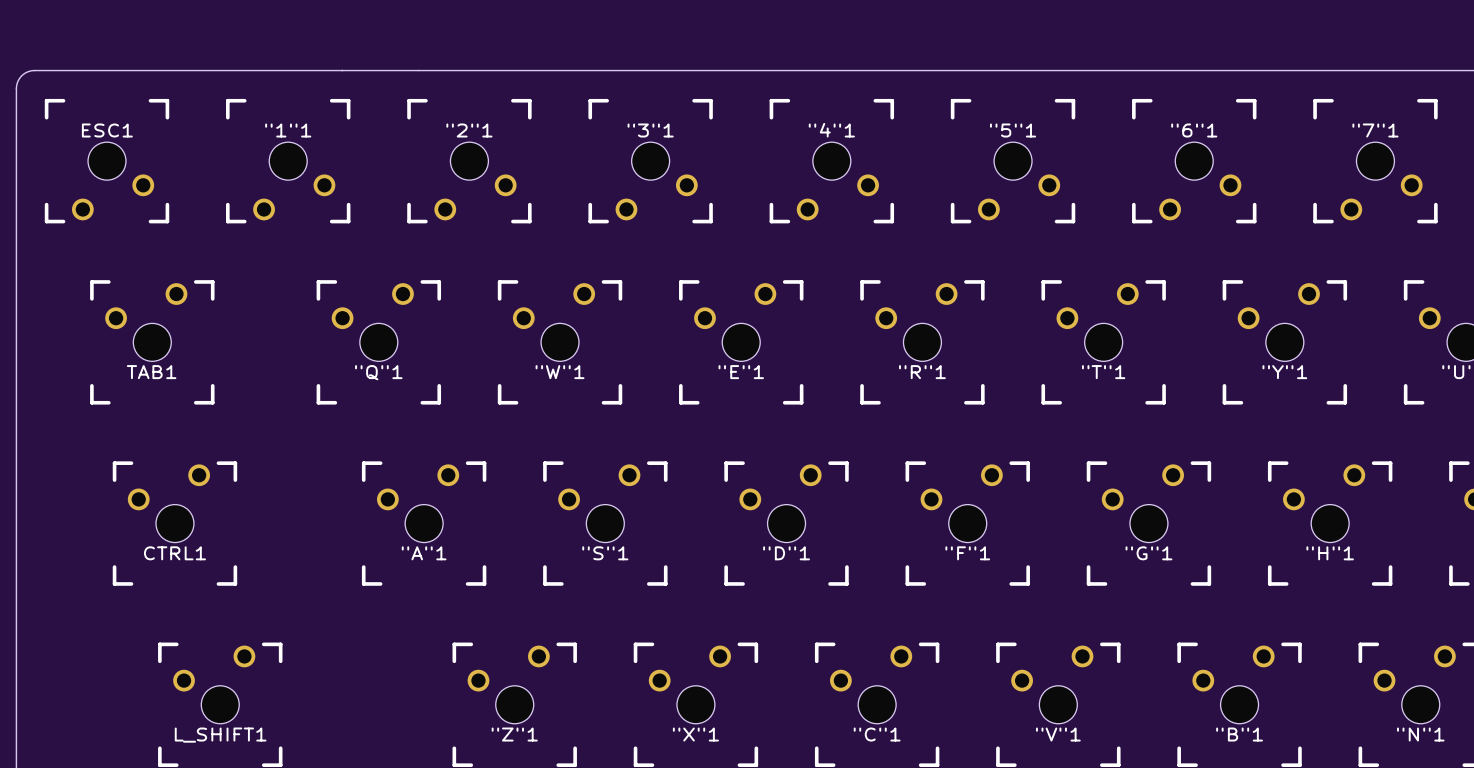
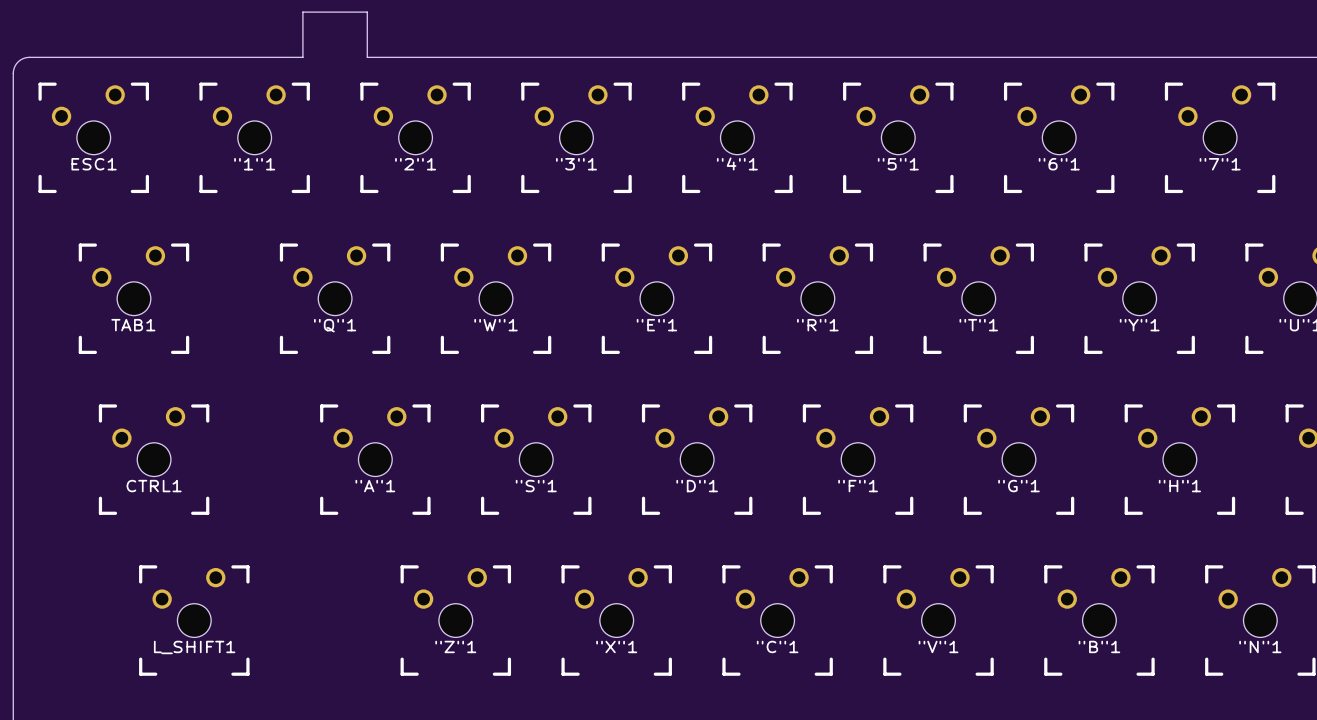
board edge: (342, 70) (415, 70) -> (302, 57) (302, 12) (367, 12) (367, 57)
ESC1 rotation: 0° (107, 161) -> 180° (93, 137)
"1"1 rotation: 0° (288, 161) -> 180° (254, 137)
"2"1 rotation: 0° (469, 161) -> 180° (415, 137)
"3"1 rotation: 0° (650, 161) -> 180° (576, 137)
"4"1 rotation: 0° (831, 161) -> 180° (737, 137)
"5"1 rotation: 0° (1013, 161) -> 180° (898, 137)
"6"1 rotation: 0° (1194, 161) -> 180° (1059, 137)
"7"1 rotation: 0° (1375, 161) -> 180° (1220, 137)

